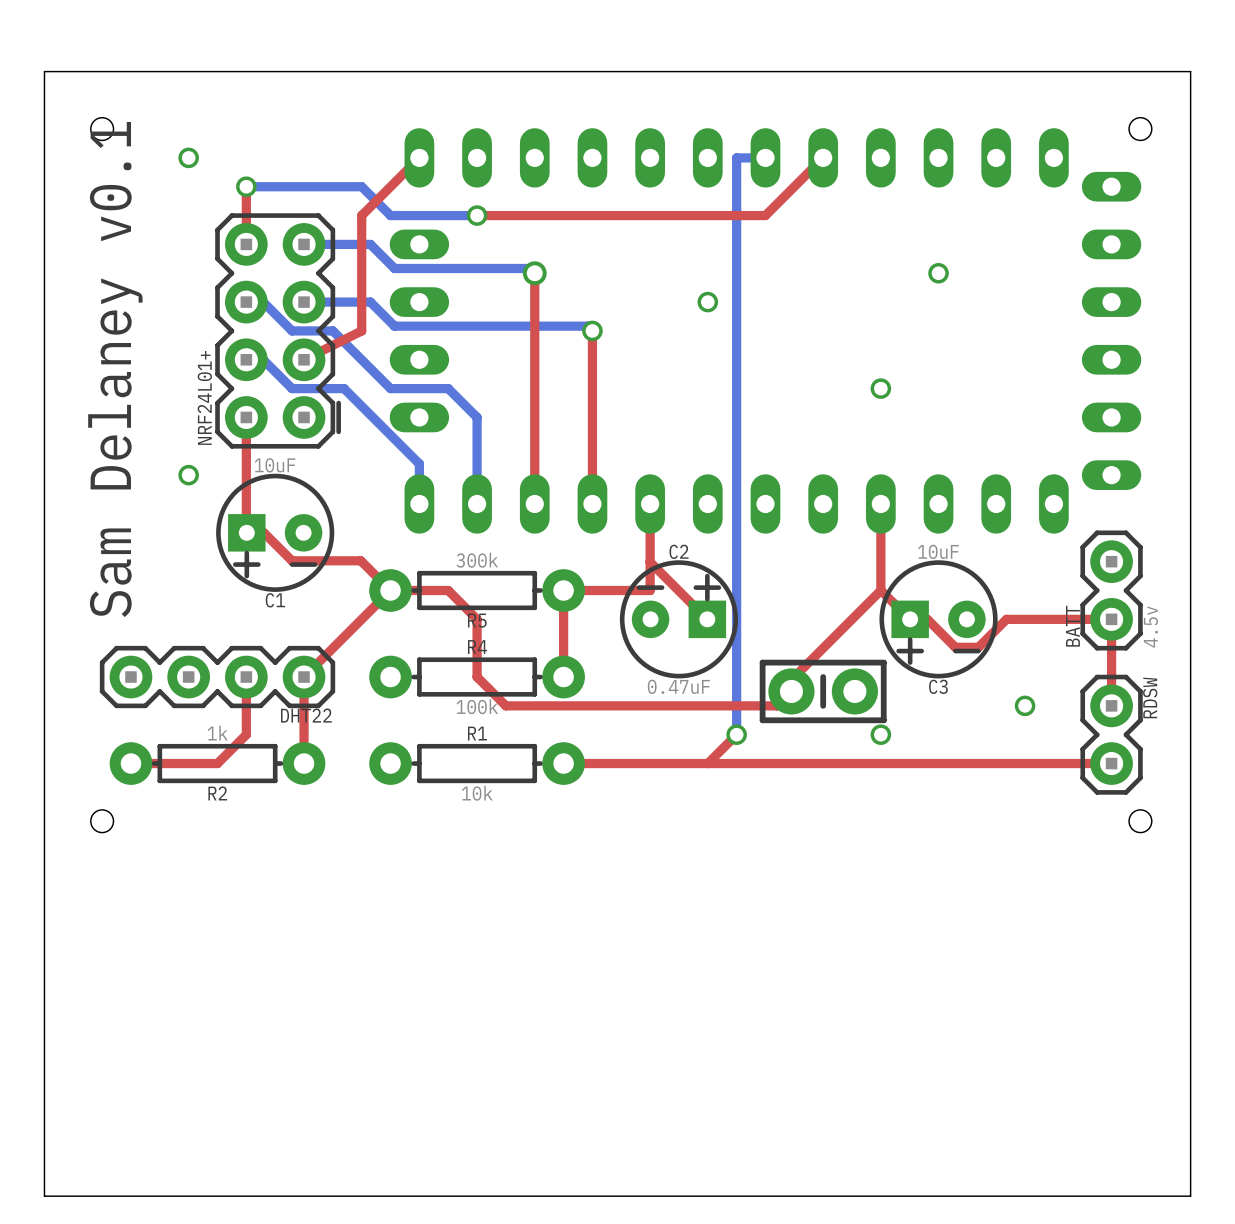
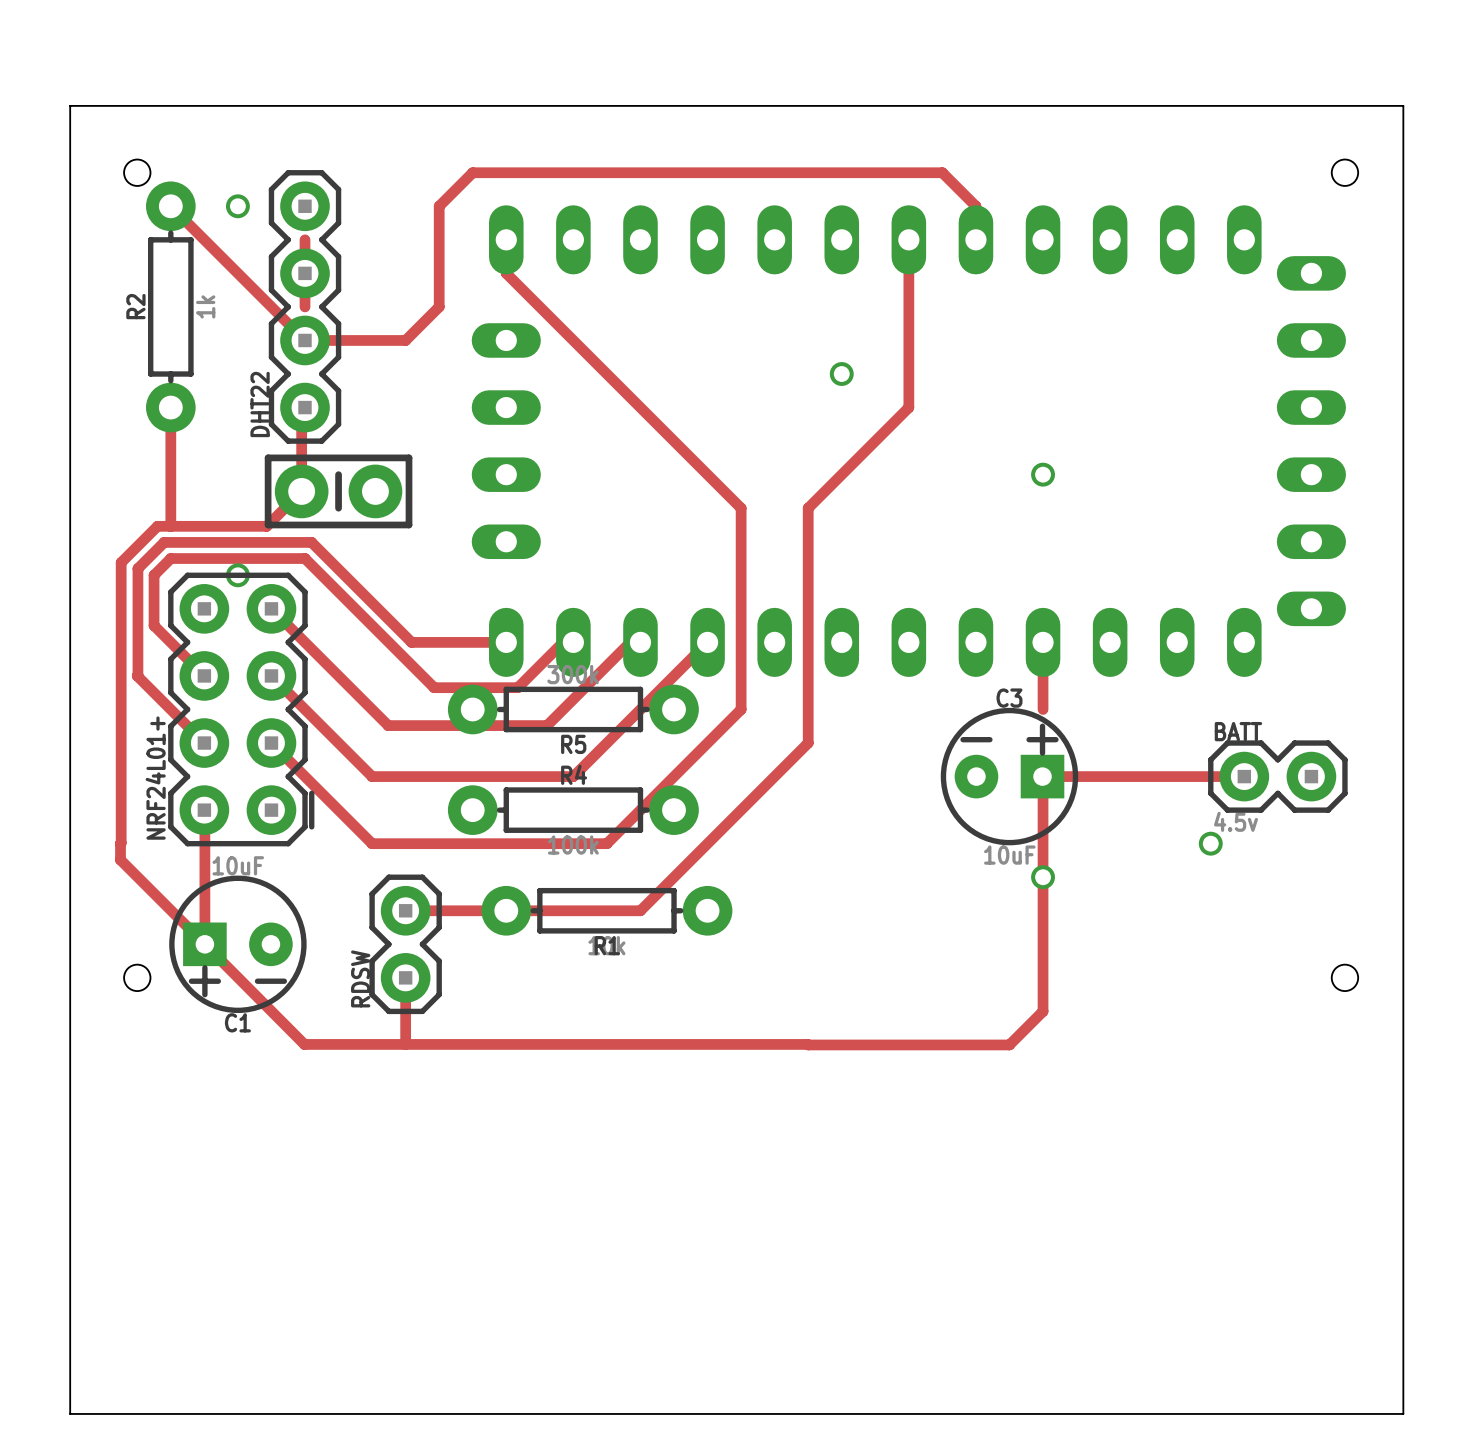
top track: (419, 157) (361, 215) -> (975, 239) (975, 206) (942, 172) (472, 172) (439, 206) (439, 273)
bottom track: (765, 157) (736, 157) (736, 734) -> none
top track: (823, 157) (765, 215) (477, 215) -> none
bottom track: (246, 186) (361, 186) (390, 215) (477, 215) -> none
via: (246, 186) -> none
top track: none -> (506, 239) (506, 273) (741, 508) (741, 709) (606, 843) (372, 843) (271, 743)
top track: none -> (908, 239) (908, 407) (808, 508) (808, 743) (640, 910) (405, 910)
via: (477, 215) -> none
bottom track: (304, 244) (370, 244) (394, 268) (530, 268) (534, 273) -> none
top track: (361, 244) (361, 330) (304, 359) -> (439, 306) (405, 340) (305, 340) (170, 206)
top track: (534, 273) (534, 503) -> none
via: (534, 273) -> none
via: (938, 273) -> none
bottom track: (246, 302) (263, 302) (292, 330) (332, 330) (390, 388) (448, 388) (477, 417) (477, 503) -> none
bottom track: (304, 302) (370, 302) (394, 326) (587, 326) (592, 330) -> none
top track: none -> (170, 407) (170, 526)
top track: none -> (305, 407) (301, 410) (301, 491) (266, 526) (157, 526) (121, 562) (120, 859) (204, 944)
NRF24L01+ position: (278, 330) -> (241, 709)
top track: (592, 330) (592, 503) -> none
via: (592, 330) -> none
part position: (765, 330) -> (908, 441)
bottom track: (246, 359) (263, 359) (292, 388) (344, 388) (419, 463) (419, 503) -> none
text: Sam Delaney v0.1 (115, 369) -> none
part: none -> (338, 491)
top track: (246, 417) (246, 532) (264, 532) (291, 560) (360, 560) (390, 590) -> none
top track: none -> (271, 608) (388, 725) (547, 725) (630, 642) (640, 642)
top track: (650, 503) (650, 590) (563, 590) (563, 677) -> none
C1 position: (275, 532) -> (237, 944)
top track: none -> (506, 642) (411, 642) (311, 542) (164, 542) (137, 568) (137, 675) (204, 743)
top track: none -> (573, 642) (563, 642) (517, 687) (434, 687) (305, 558) (170, 558) (154, 575) (154, 625) (204, 675)
top track: none -> (707, 642) (573, 776) (372, 776) (271, 675)
top track: (650, 562) (707, 619) -> none
top track: (390, 590) (304, 677) (304, 763) -> none
top track: (390, 590) (448, 590) (477, 619) (477, 677) (505, 705) (777, 705) (791, 691) (791, 679) (880, 590) (910, 619) (927, 619) (955, 647) (978, 647) (1006, 619) (1111, 619) (1111, 705) -> none
BATT rotation: 0° (1111, 590) -> 90° clockwise (1277, 776)
C2: 0.47uF (678, 619) -> none
C3 rotation: 0° (938, 619) -> 180° (1009, 776)
C3 position: (938, 619) -> (1009, 776)
top track: none -> (1244, 776) (1042, 776) (1043, 1011) (1009, 1044) (304, 1044) (204, 944)
top track: none -> (204, 810) (204, 944)
DHT22 rotation: 0° (217, 677) -> 90° clockwise (305, 306)
DHT22 position: (217, 677) -> (305, 306)
top track: (246, 677) (246, 734) (217, 763) (130, 763) -> none
part: (823, 691) -> none
R1 name position: R1 (477, 733) -> R1 (607, 945)
top track: (736, 734) (707, 763) -> none
via: (736, 734) -> none
RDSW: (1111, 734) -> none
R2 rotation: 0° (217, 763) -> 90° clockwise (170, 306)
R2 position: (217, 763) -> (170, 306)
R1 position: (477, 763) -> (606, 910)
top track: (563, 763) (1111, 763) -> none
RDSW: none -> (405, 944)
top track: none -> (405, 977) (405, 1044)

